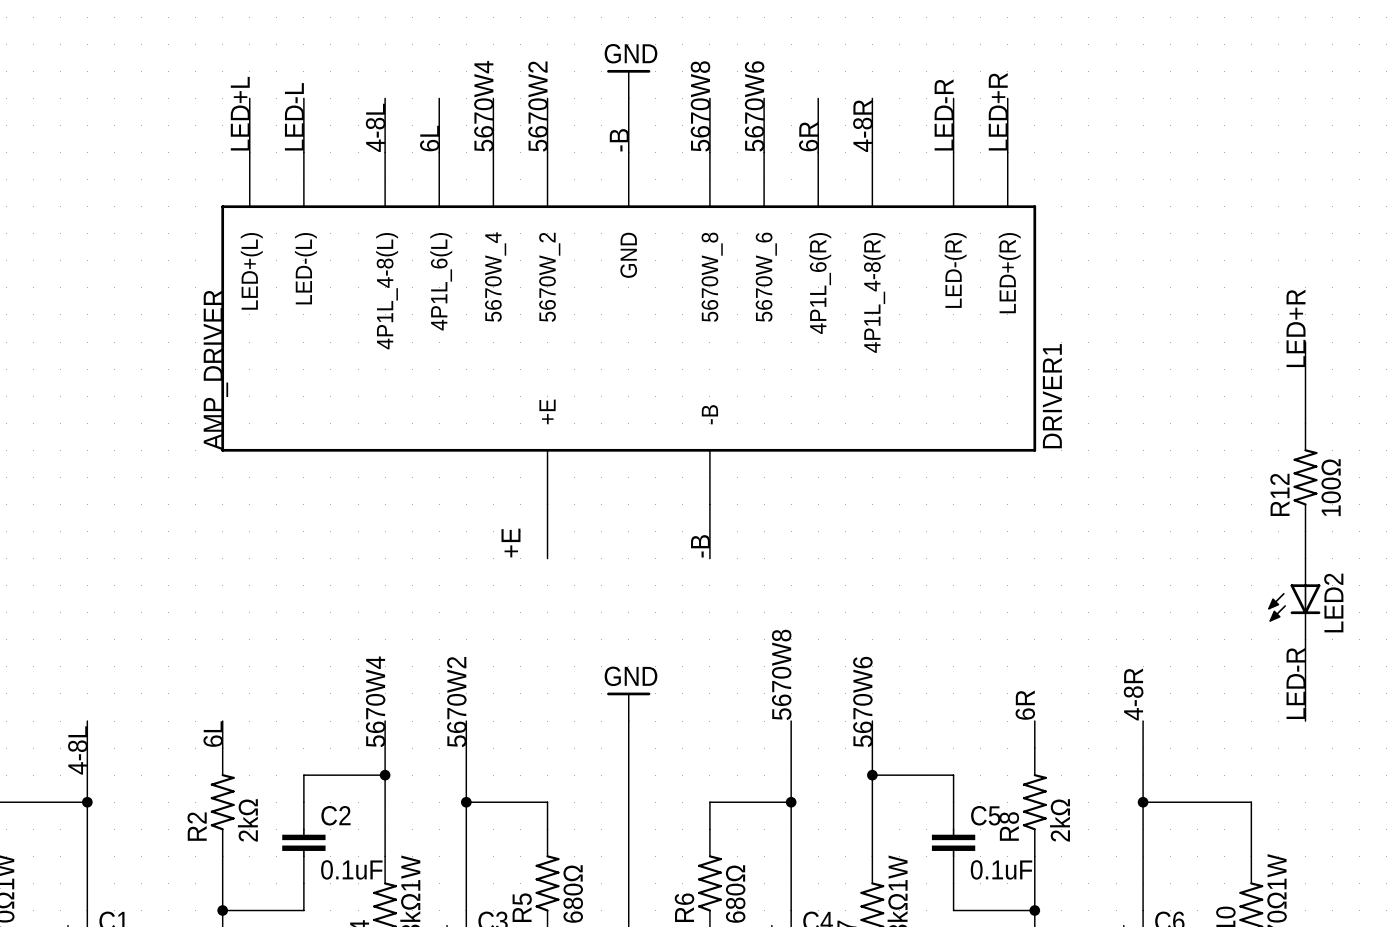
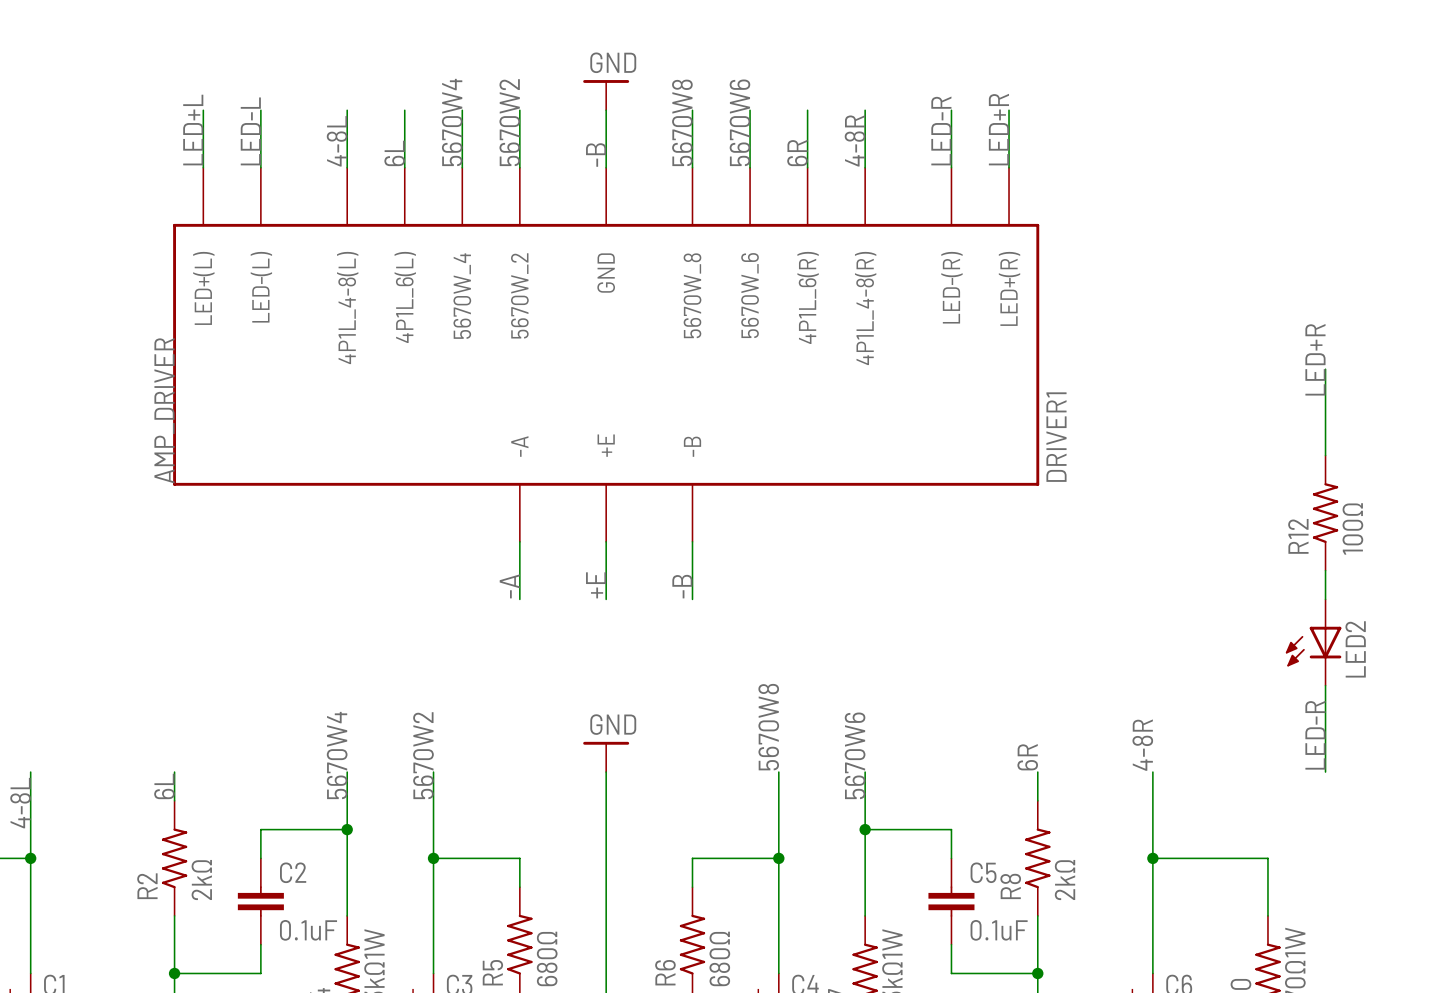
DRIVER1 symbol: [221, 152, 1037, 505] -> [173, 167, 1040, 542]
wire: none -> (606, 541) (606, 599)
label position: +E (510, 543) -> +E (596, 585)
label: none -> -A (509, 586)

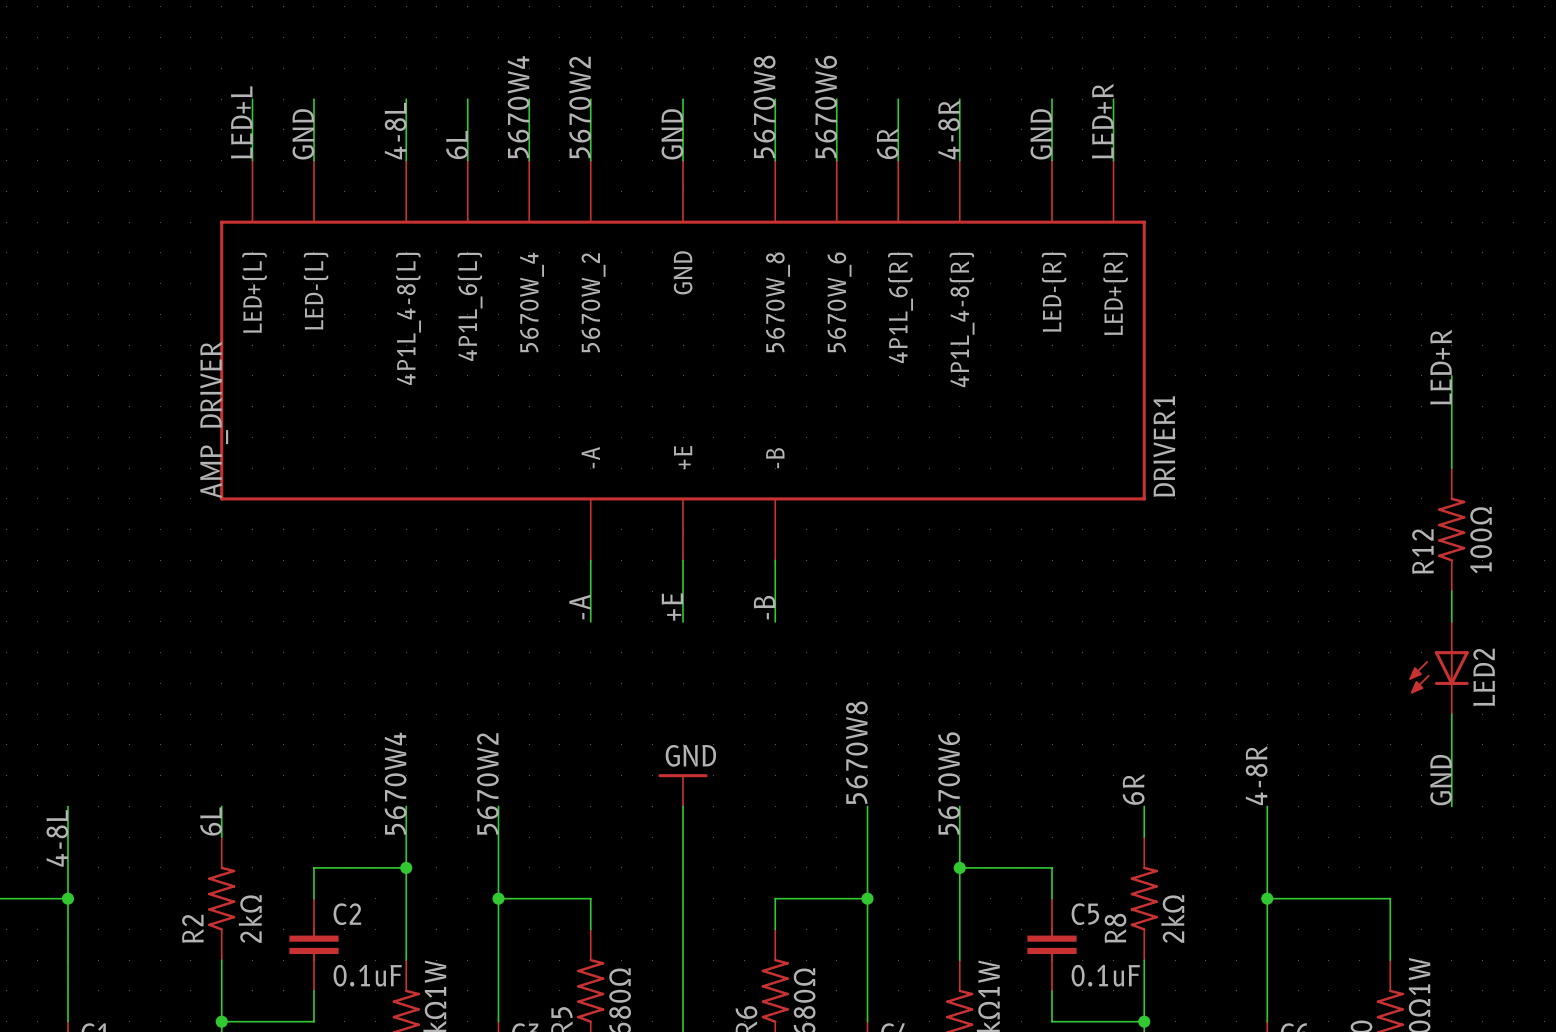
power symbol: GND (606, 95) -> none
label: LED-L (250, 131) -> GND (303, 134)
label: LED-R (941, 131) -> GND (1041, 134)
label: -B (596, 155) -> GND (672, 134)
label: LED-R (1315, 735) -> GND (1441, 780)

